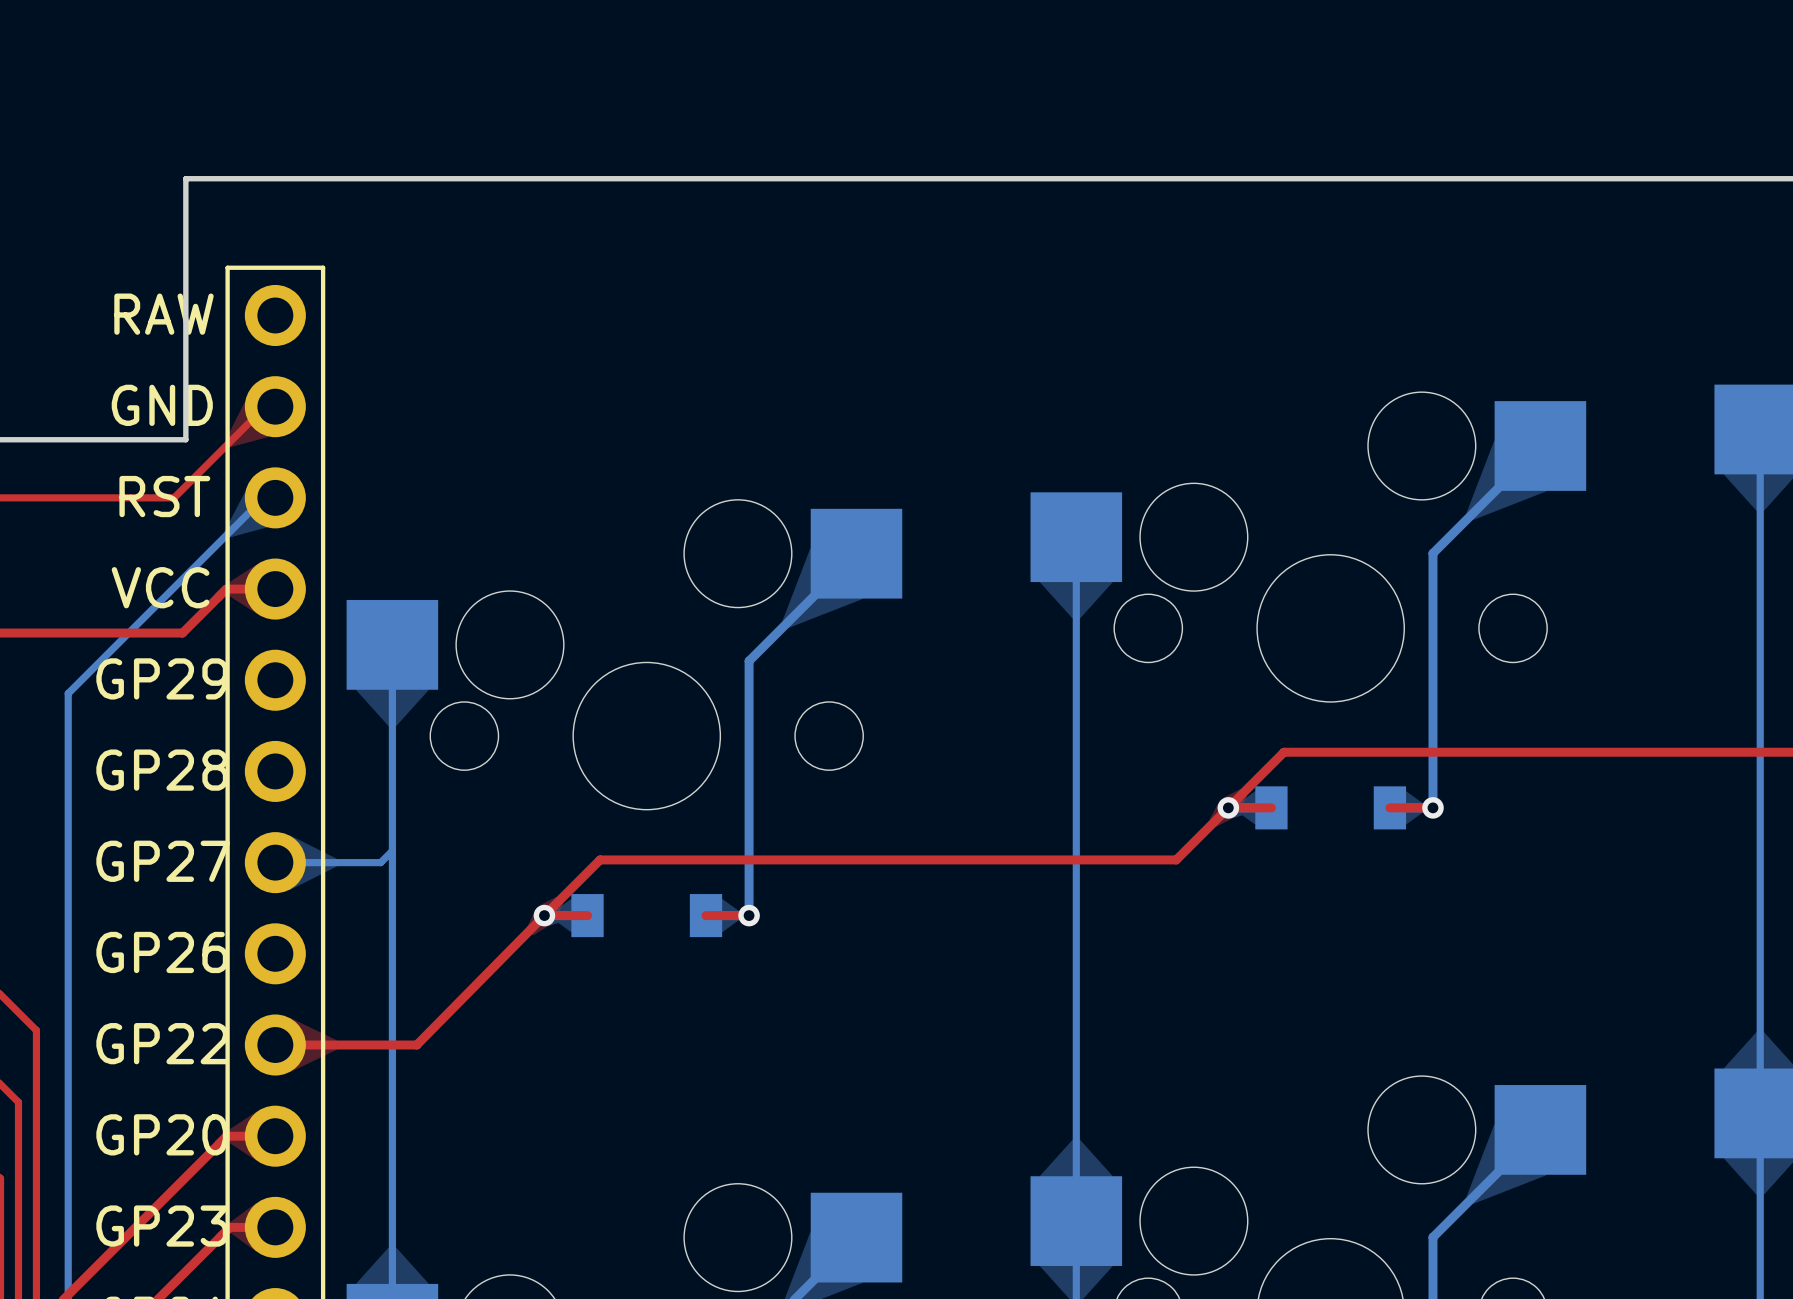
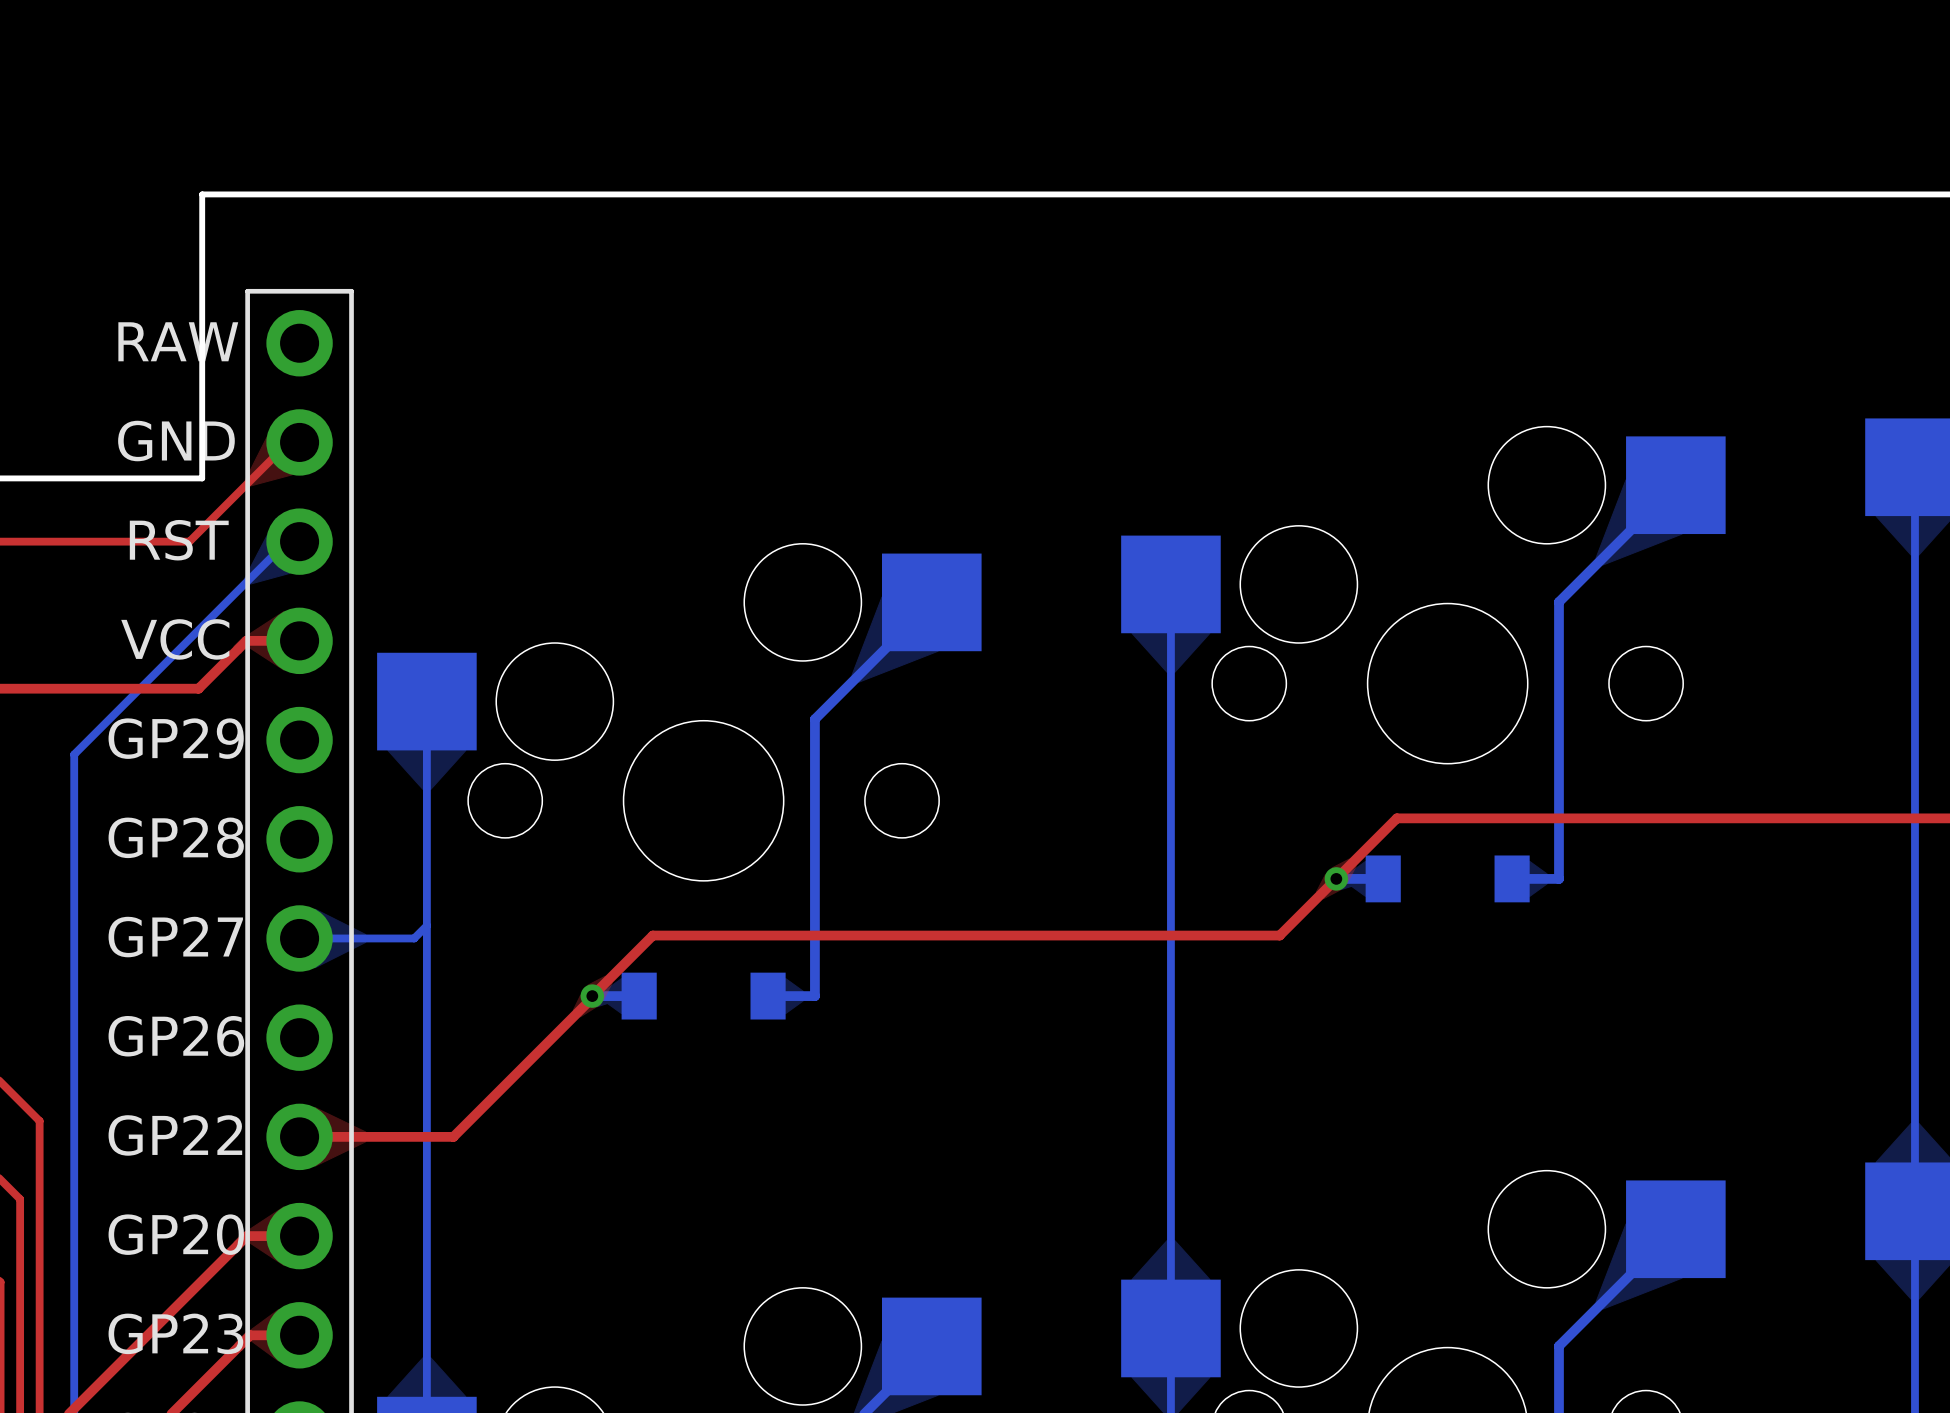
top track: (1228, 807) (1271, 807) -> none
top track: (1389, 807) (1432, 807) -> none
via: (1432, 807) -> none
top track: (587, 915) (544, 915) (416, 1045) -> (592, 996) (453, 1136)
top track: (705, 915) (749, 915) -> none
via: (749, 915) -> none

